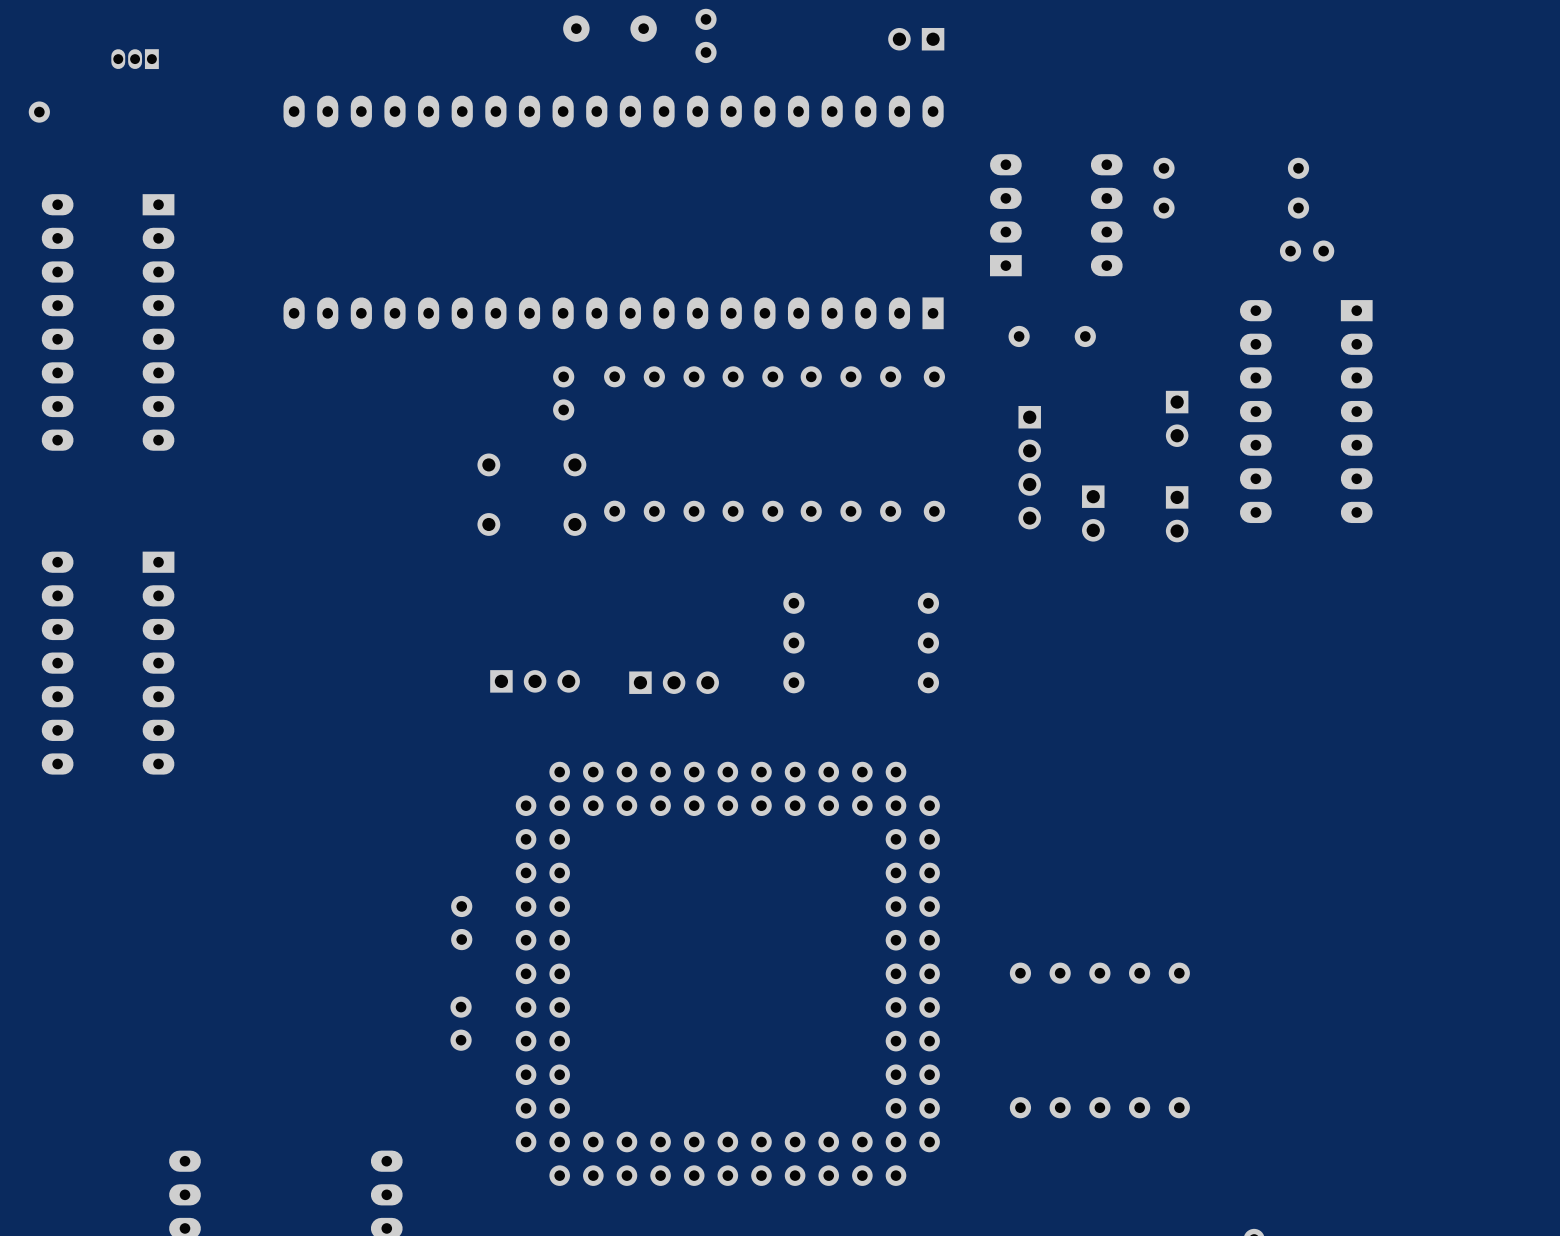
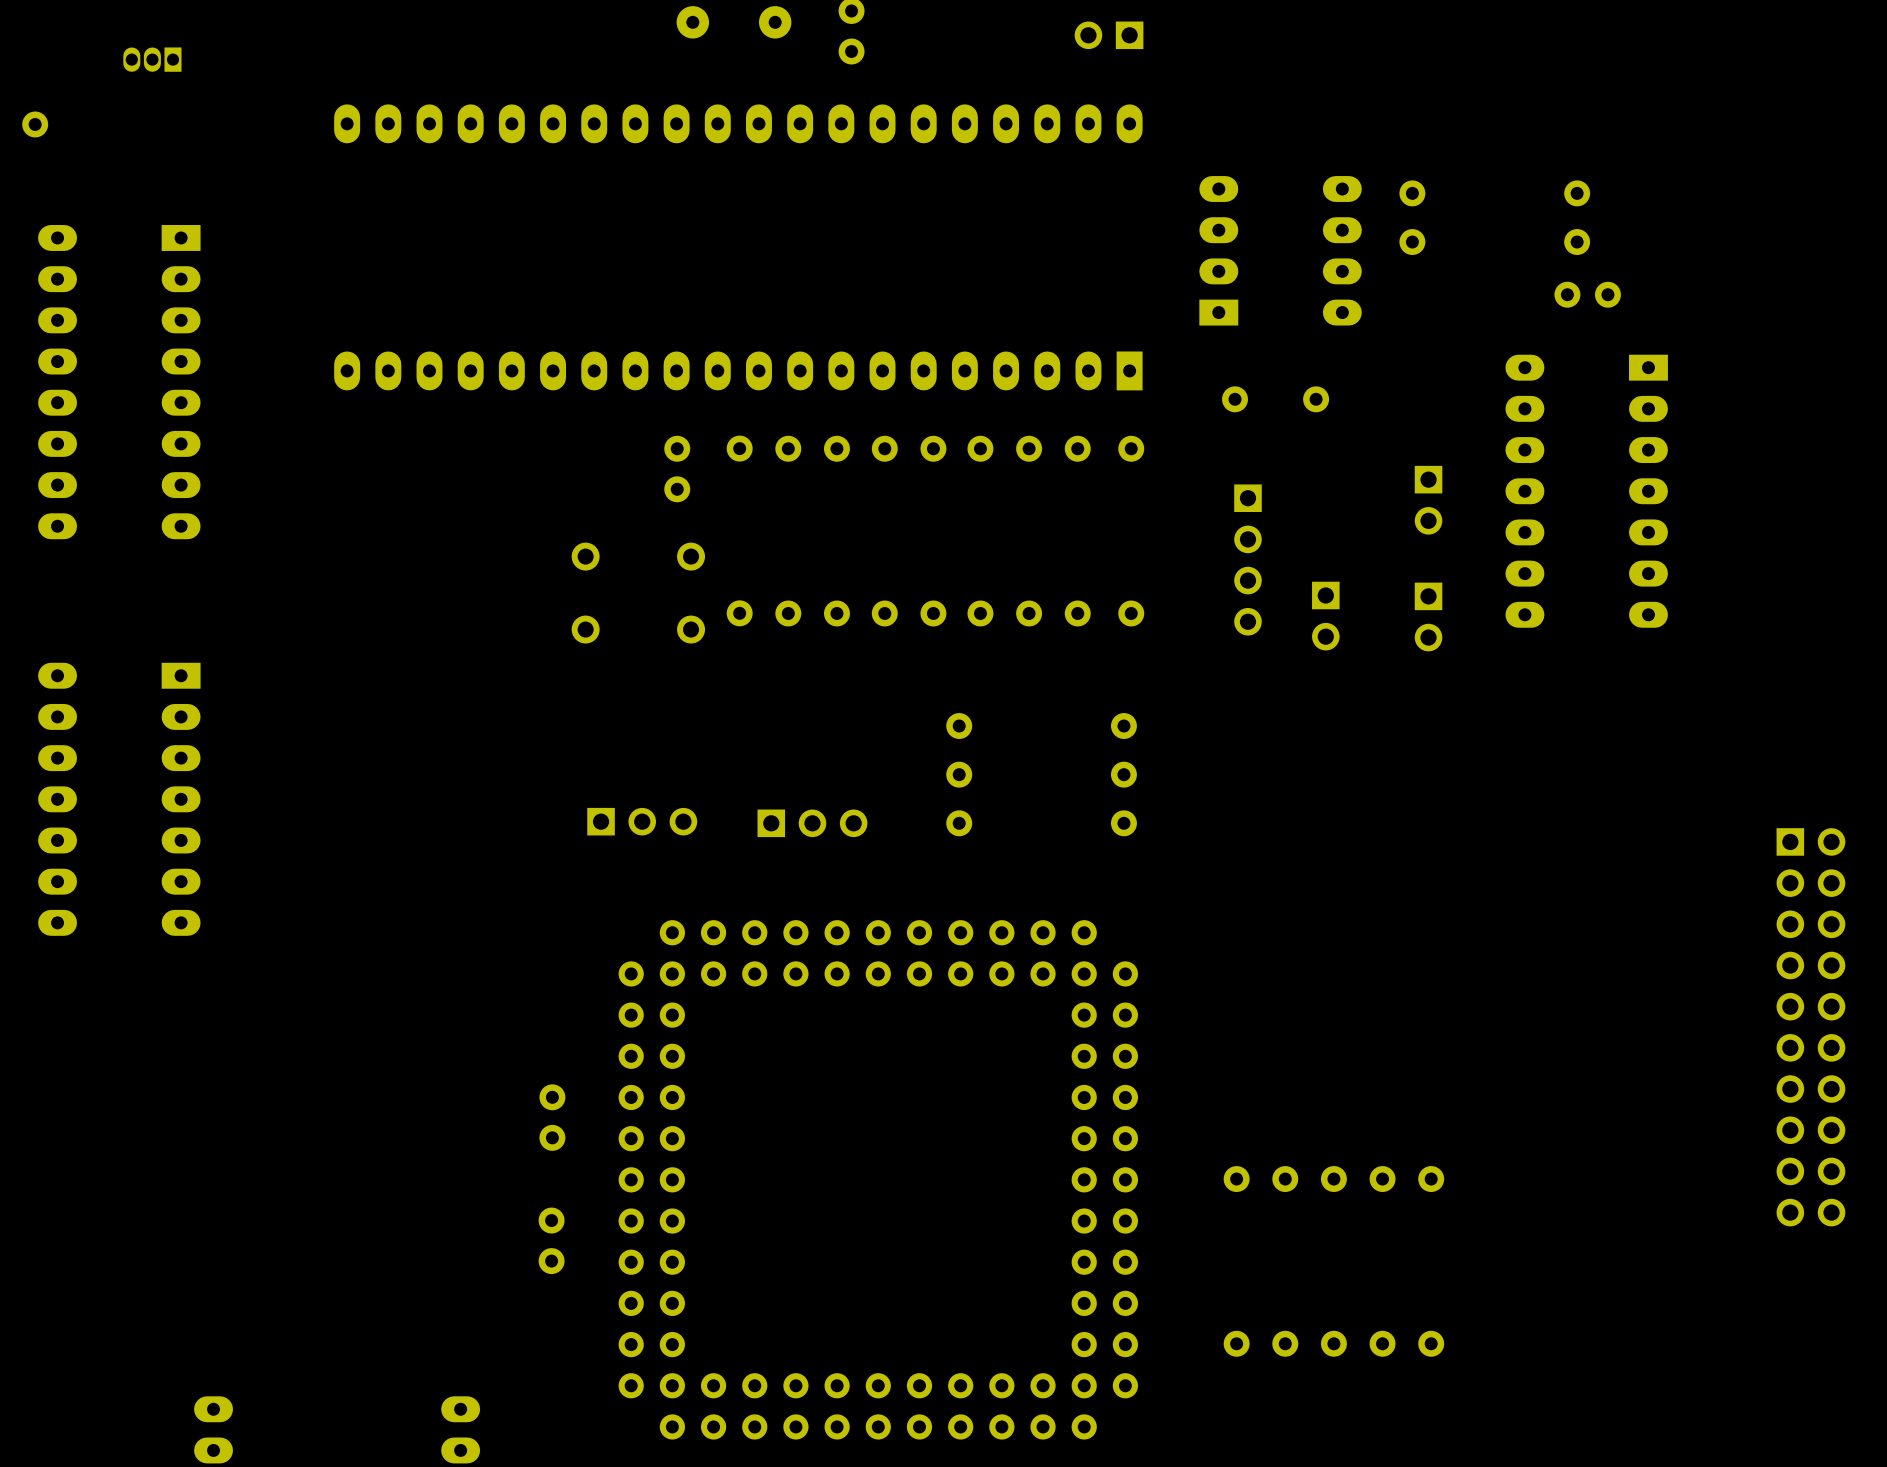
part: none -> (1810, 1027)

